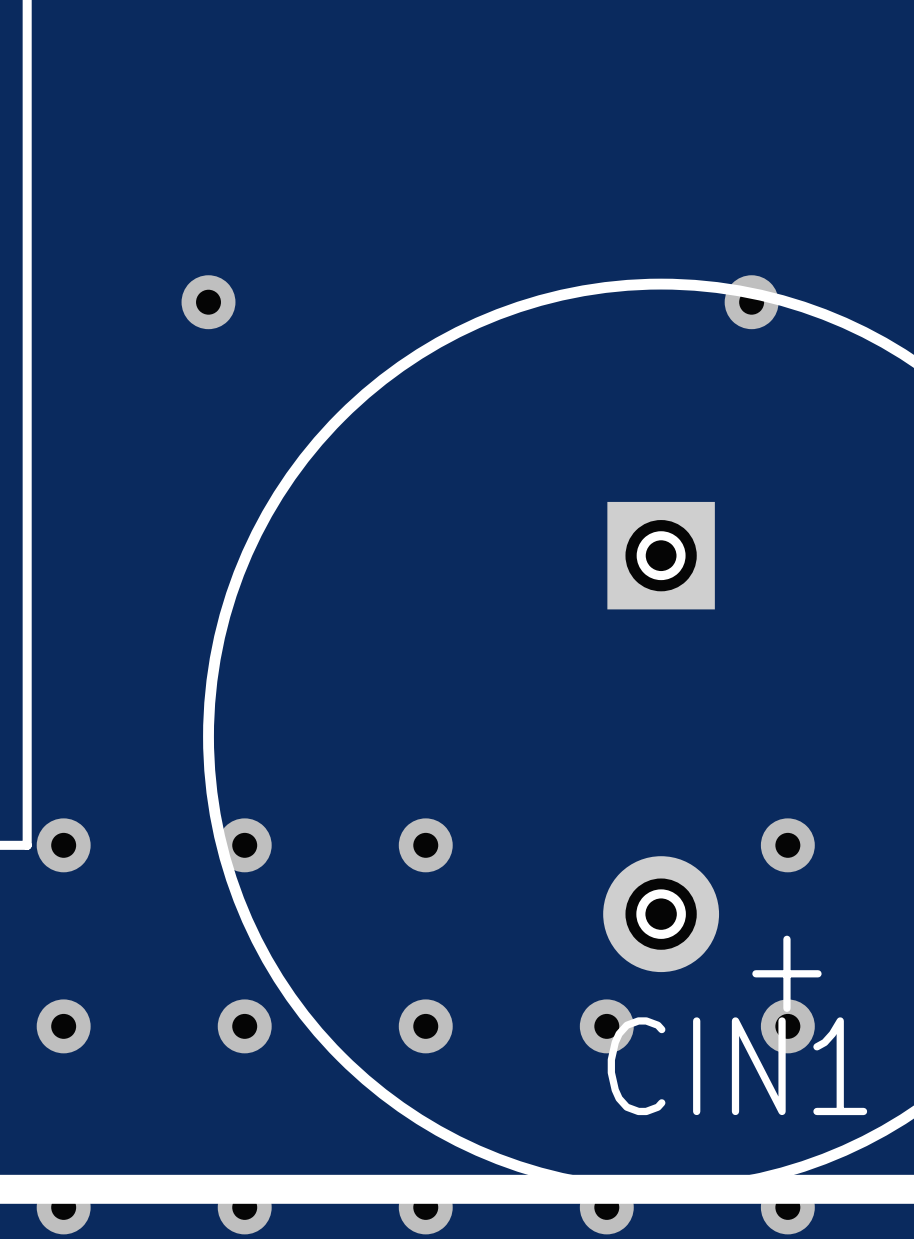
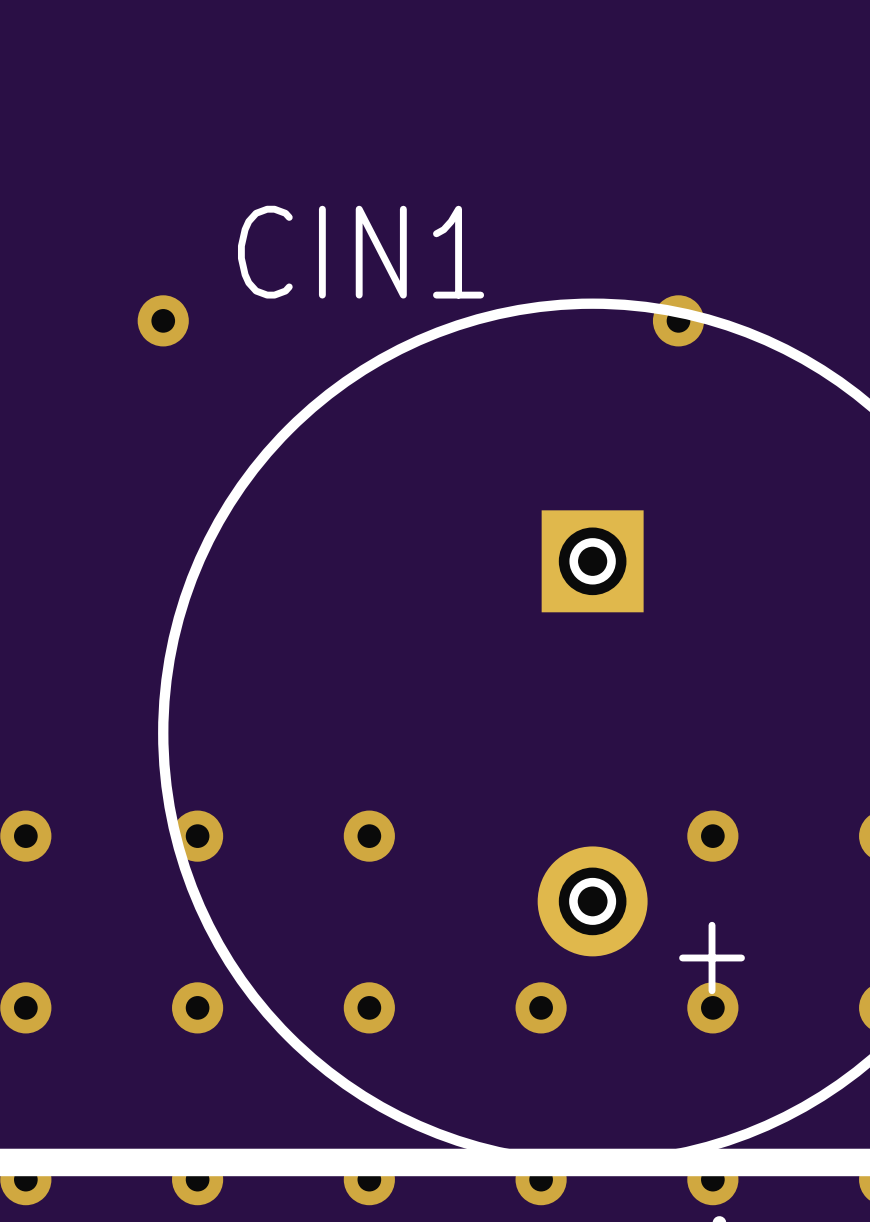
CIN1 name position: CIN1 (737, 1066) -> CIN1 (361, 252)

